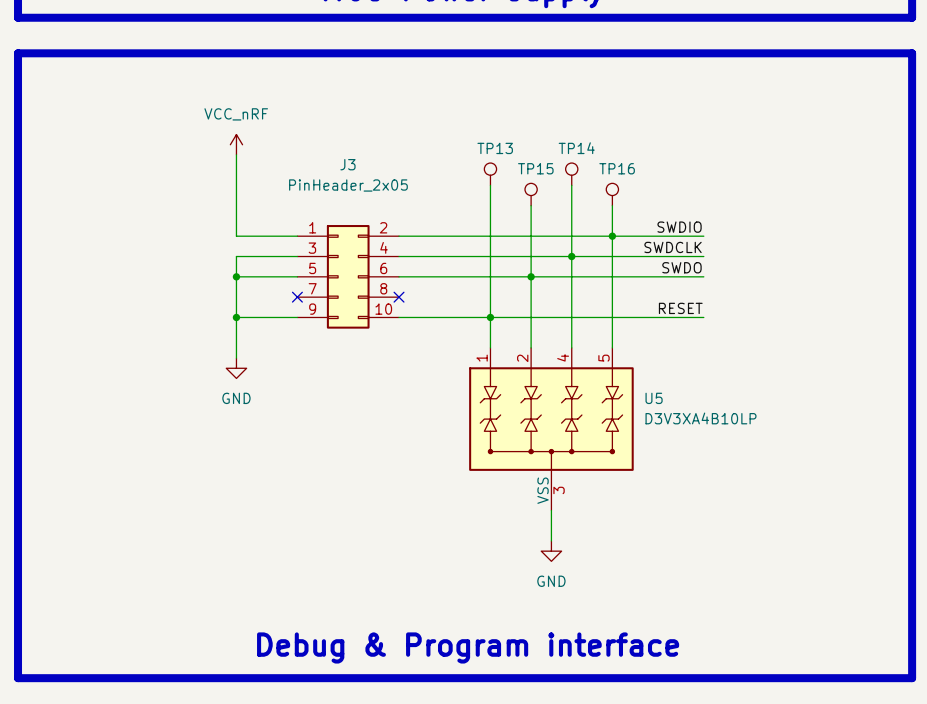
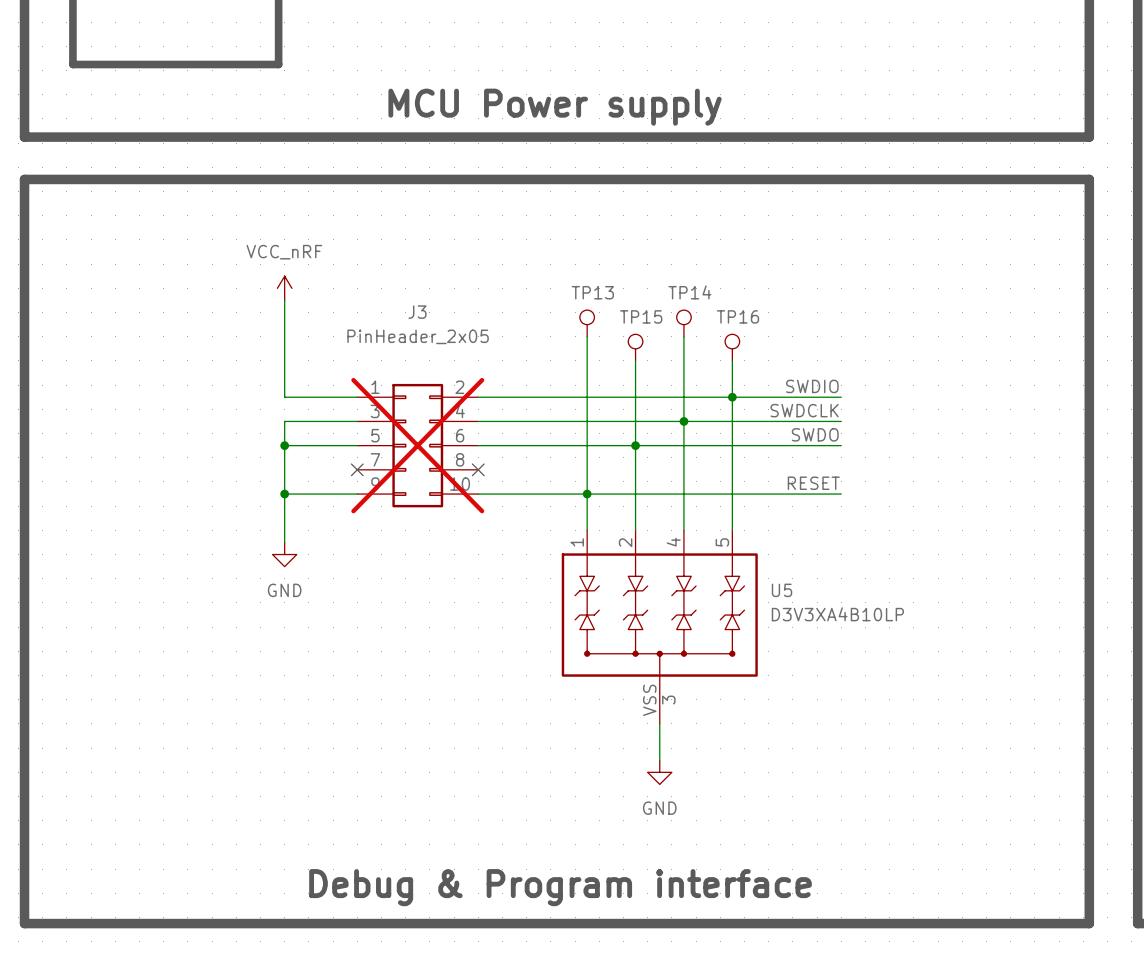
J3 do-not-place cross: none -> (417, 445)

